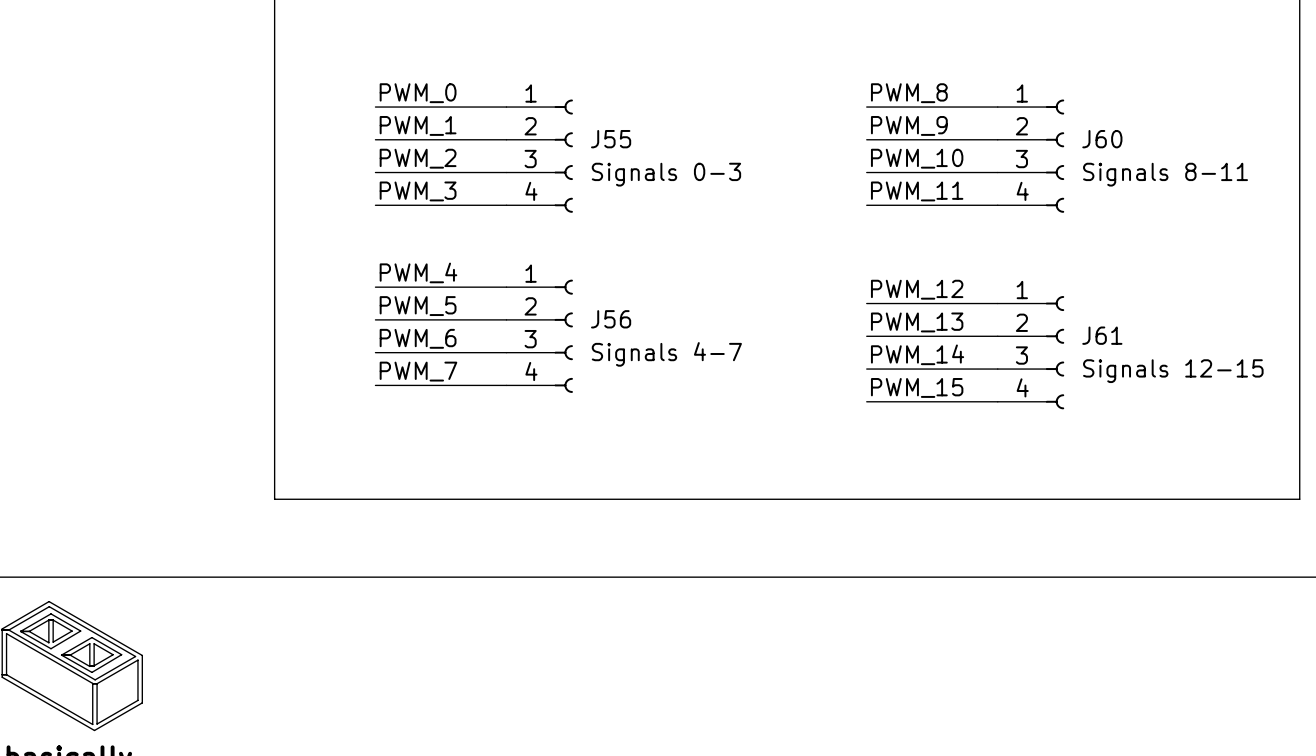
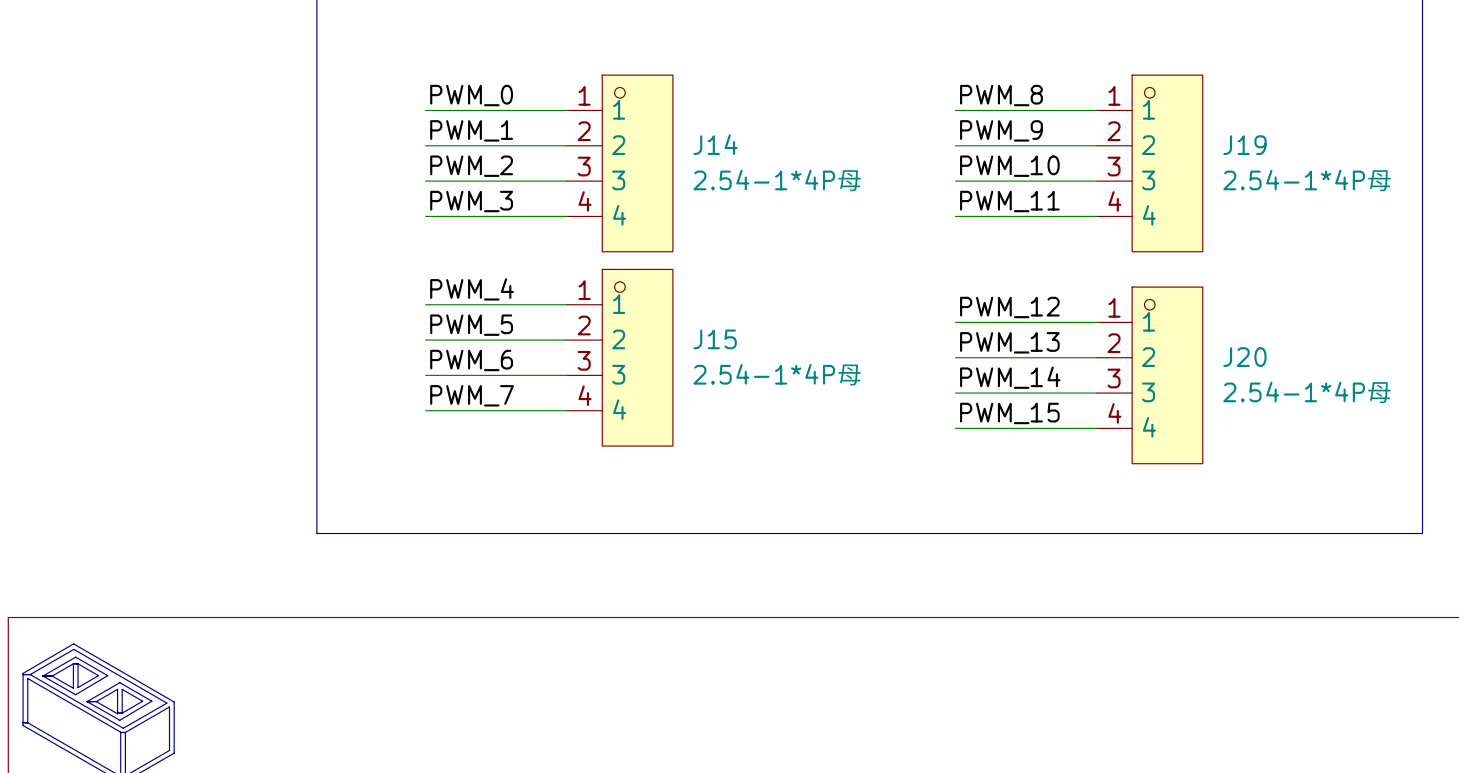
J55: Signals 0-3 (539, 156) -> none
J14: none -> 2.54-1*4P母 (619, 163)
J60: Signals 8-11 (1030, 156) -> none
J19: none -> 2.54-1*4P母 (1149, 163)
J56: Signals 4-7 (539, 336) -> none
J15: none -> 2.54-1*4P母 (619, 357)
J61: Signals 12-15 (1030, 352) -> none
J20: none -> 2.54-1*4P母 (1149, 375)

